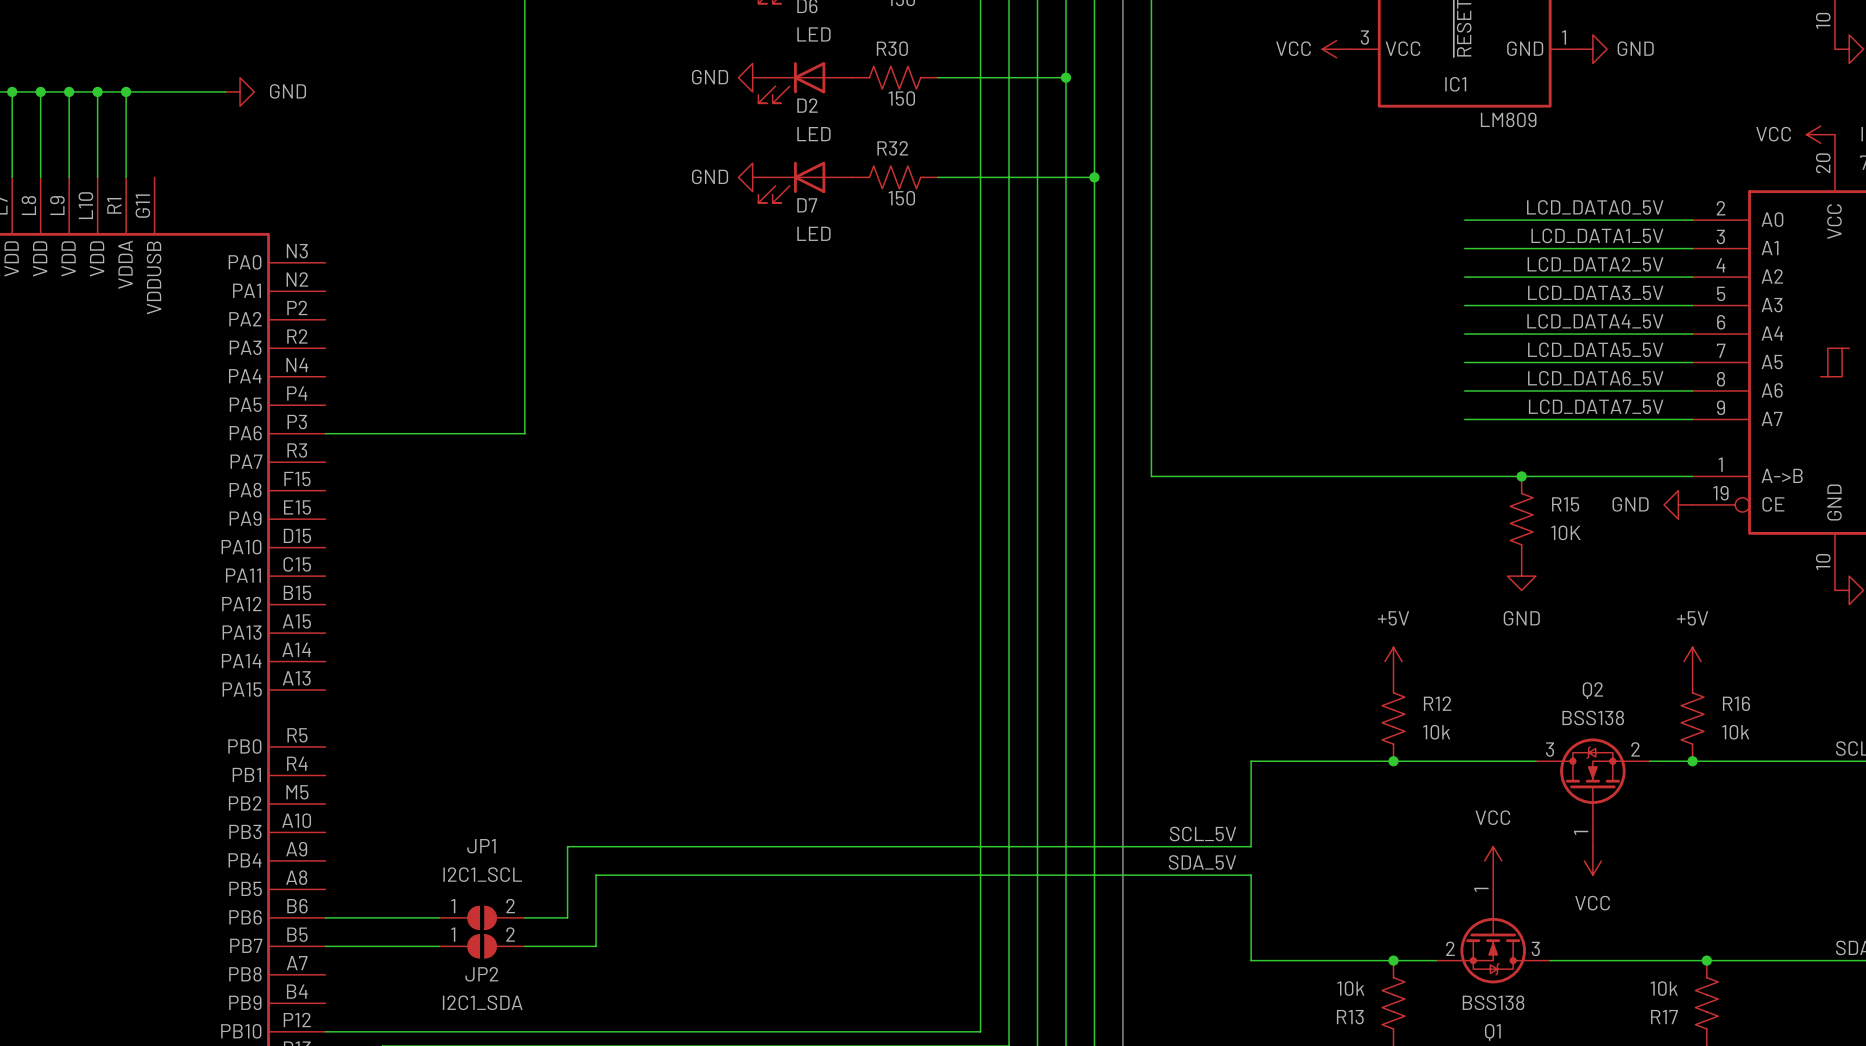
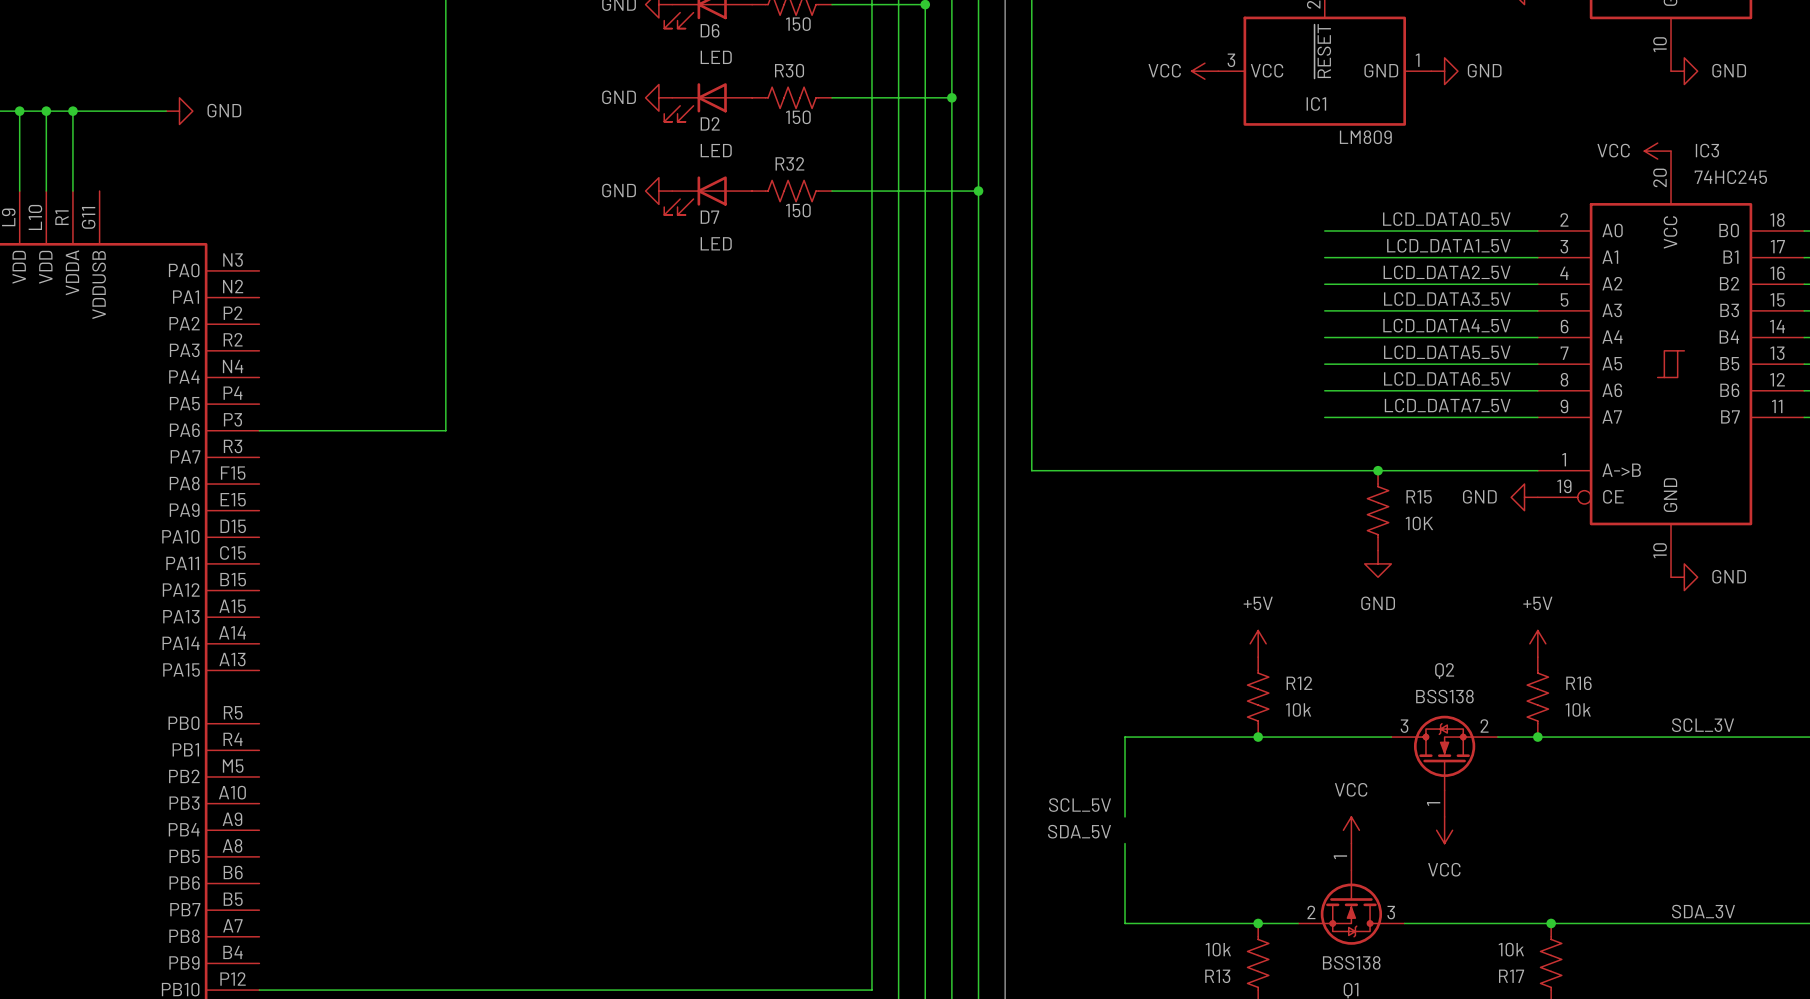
wire: (1251, 846) (567, 846) (567, 917) (524, 917) -> none
wire: (1251, 875) (596, 875) (596, 946) (524, 946) -> none
wire: (325, 917) (439, 917) -> none
JP1: I2C1_SCL (482, 917) -> none
wire: (325, 946) (439, 946) -> none
JP2: I2C1_SDA (482, 946) -> none

